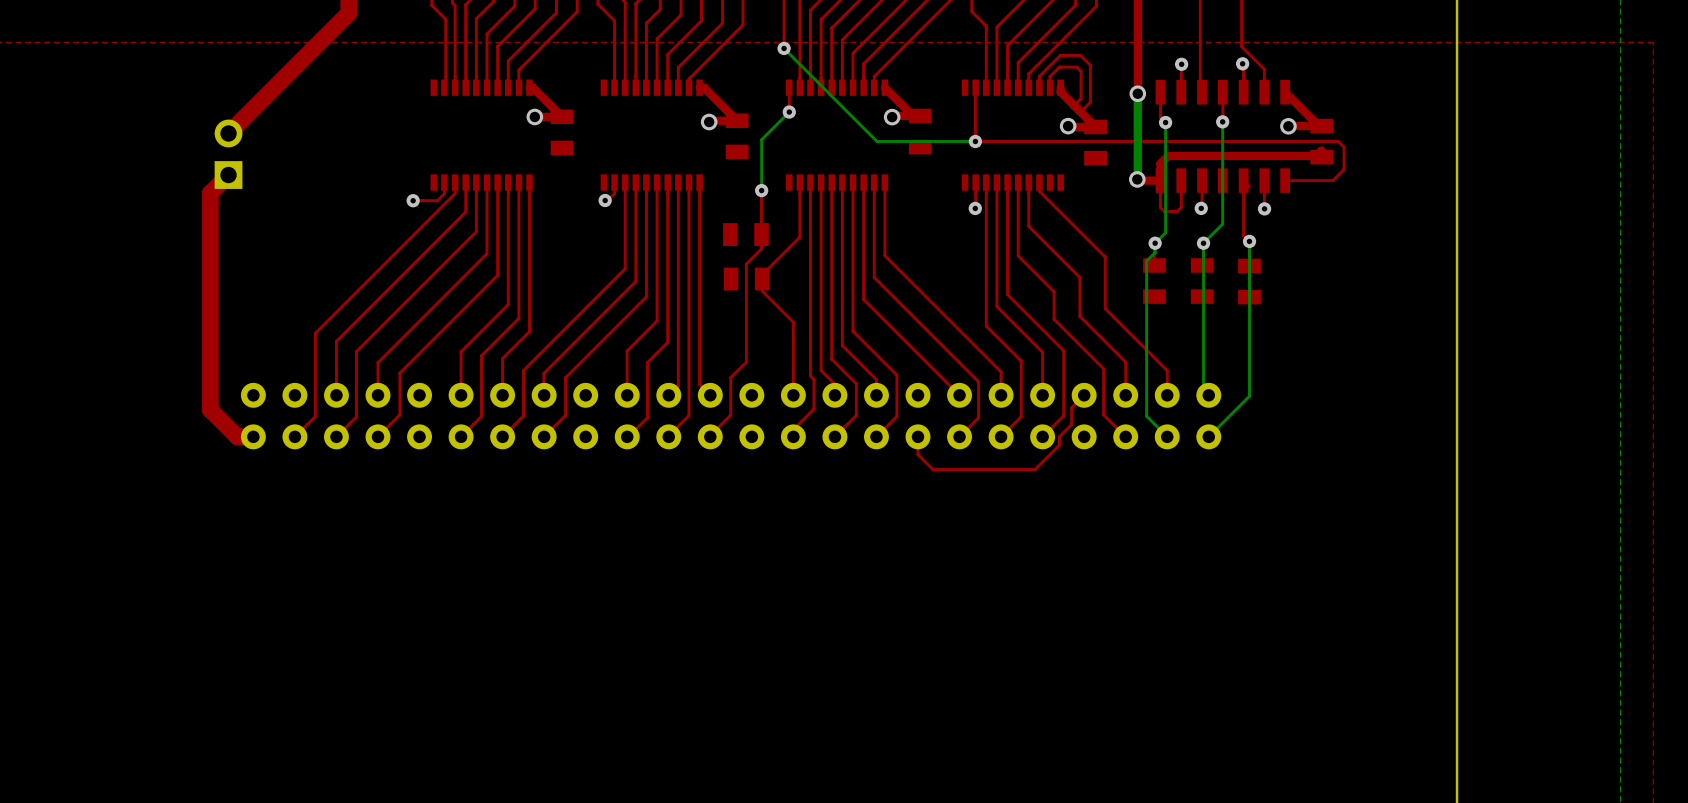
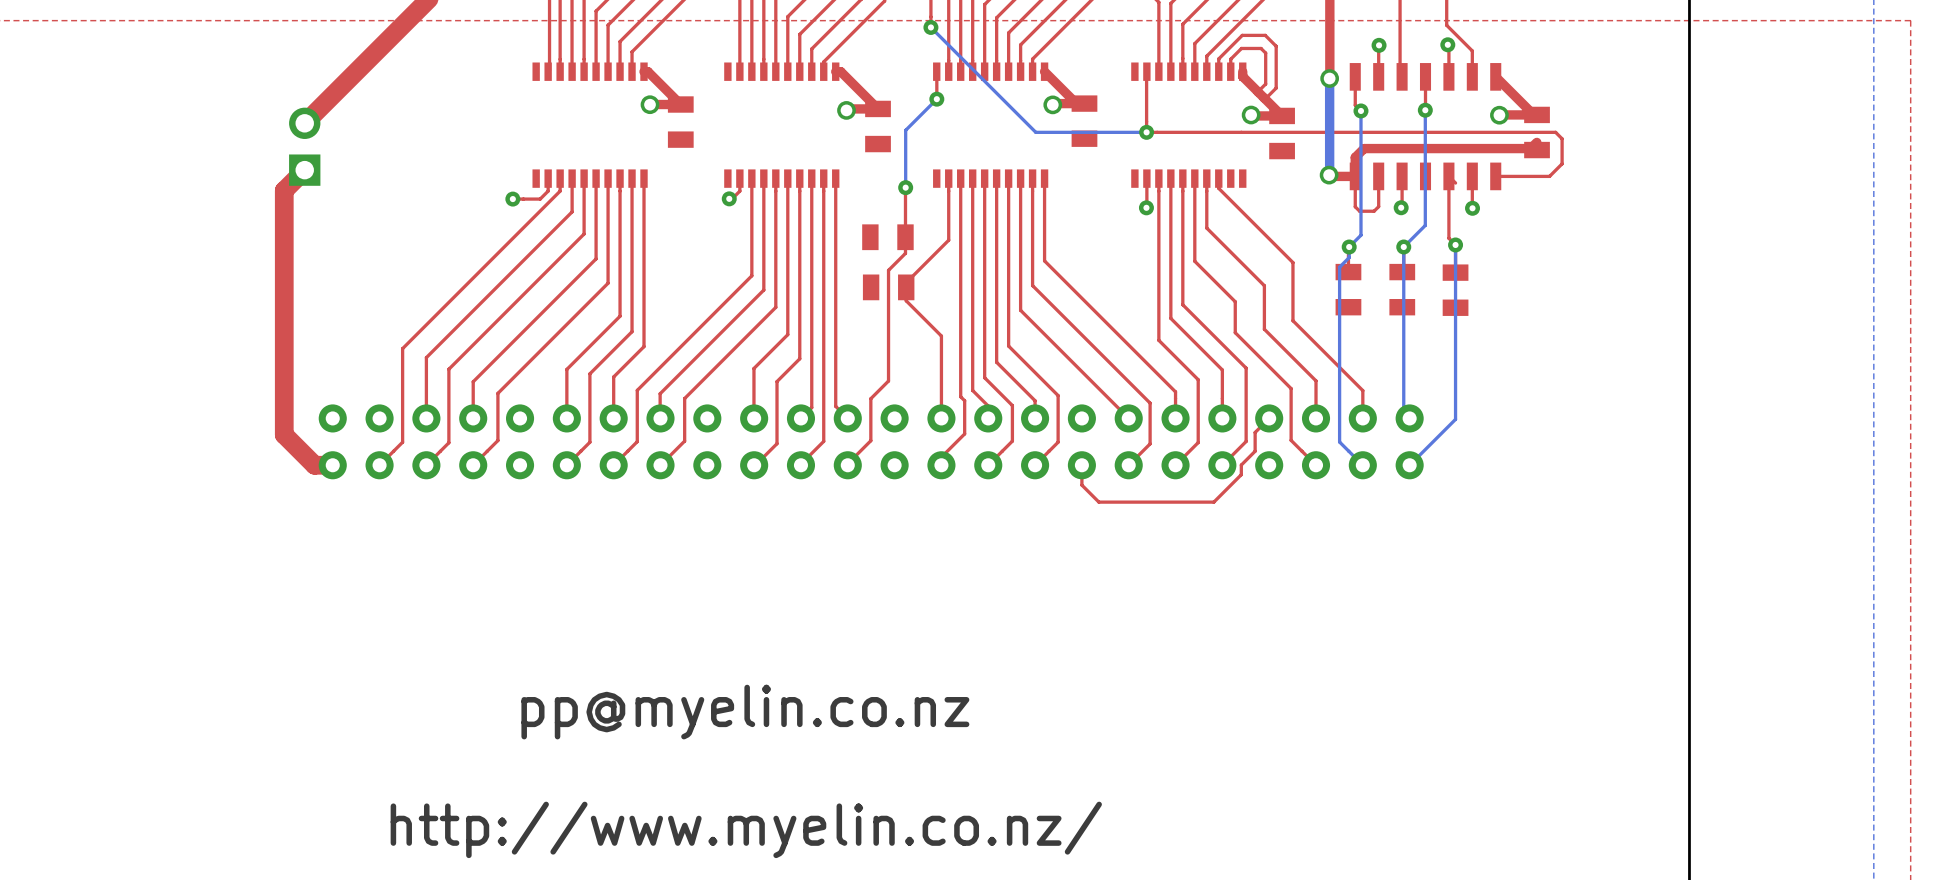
text: none -> pp@myelin.co.nz (745, 712)
text: none -> http://www.myelin.co.nz/ (746, 829)

